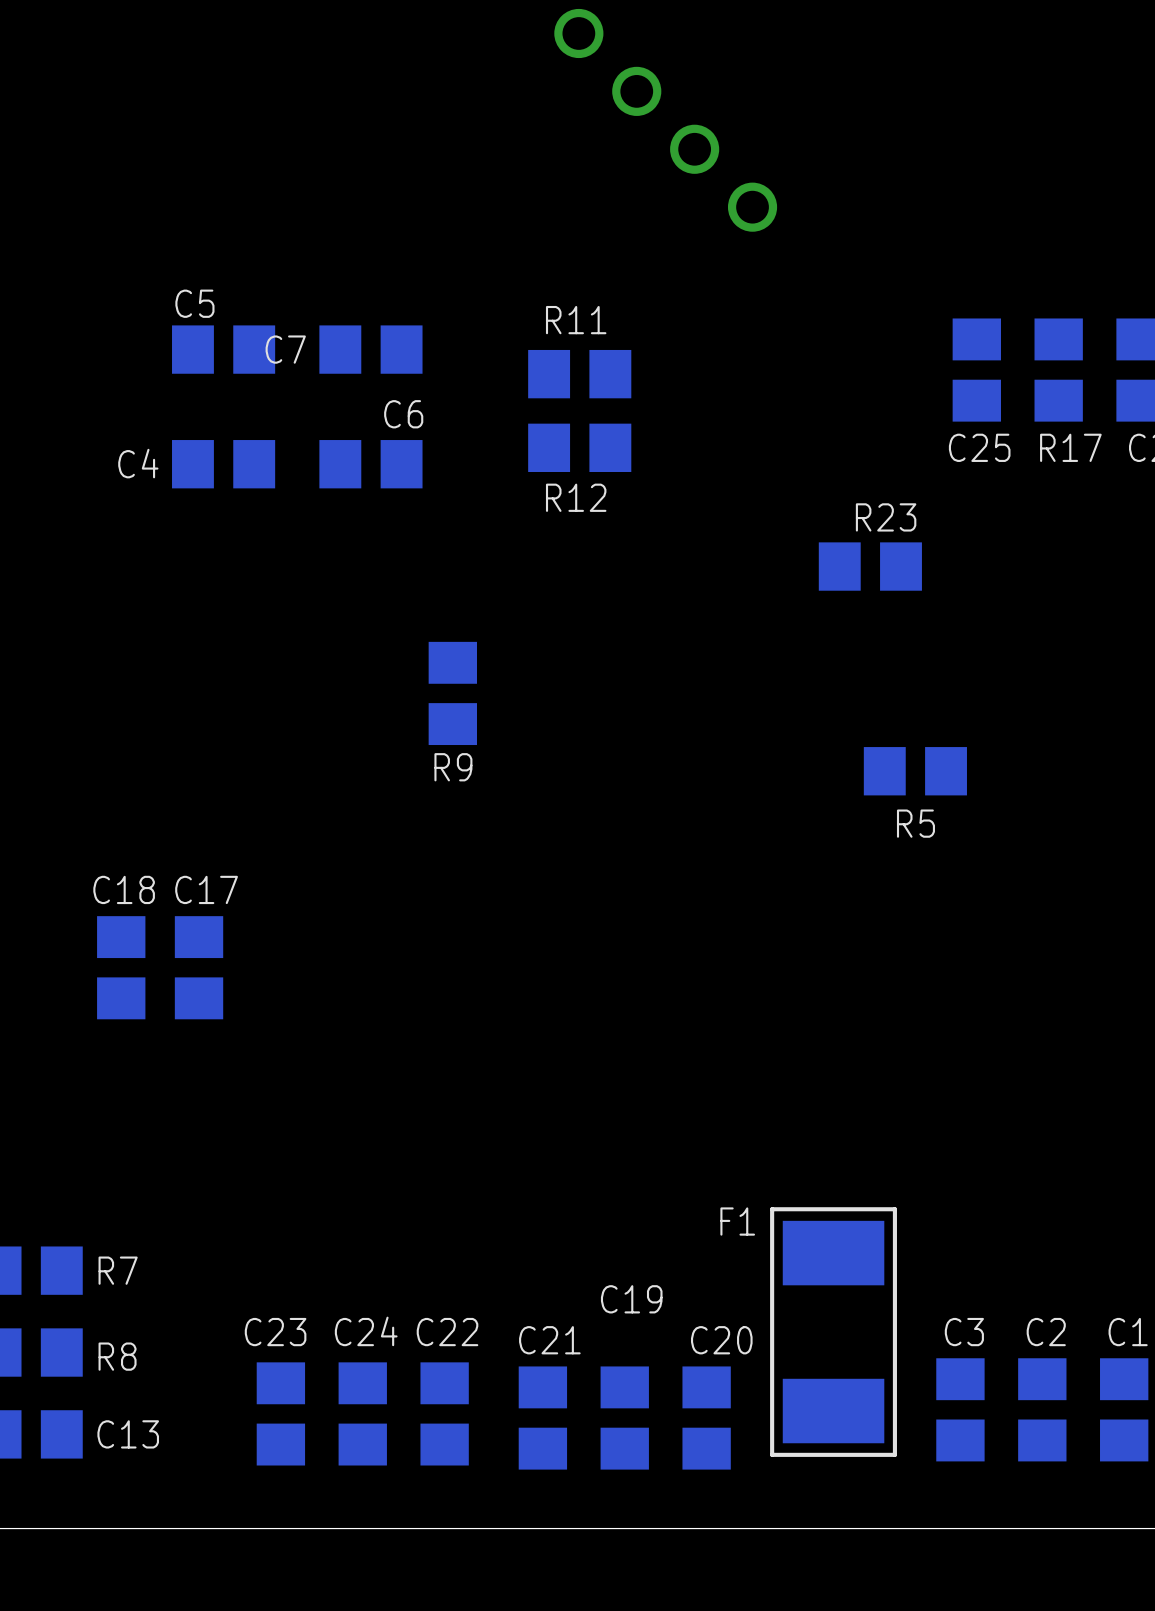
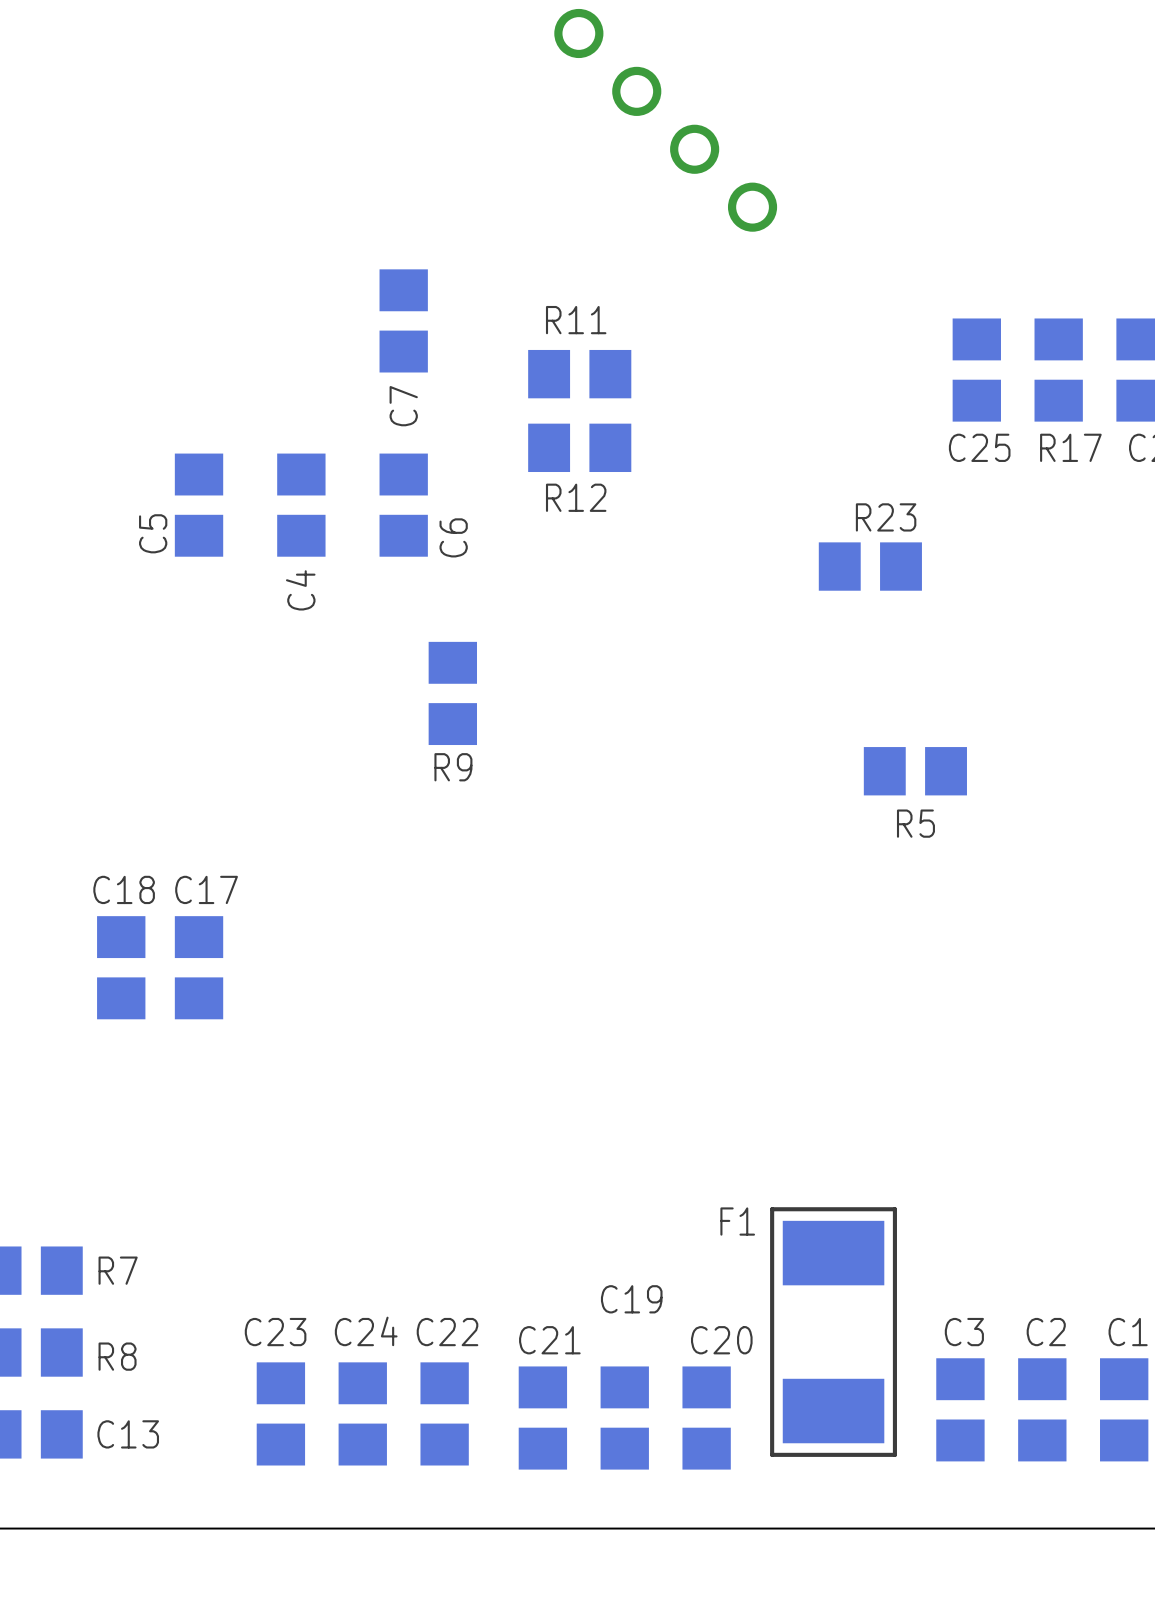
C5 name position: C5 (194, 303) -> C5 (153, 533)
C5 rotation: 0° (223, 349) -> 90° clockwise (199, 505)
C5 position: (223, 349) -> (199, 505)
C7 name position: C7 (285, 349) -> C7 (403, 406)
C7 rotation: 0° (370, 349) -> 90° clockwise (403, 320)
C4 name position: C4 (138, 463) -> C4 (300, 590)
C4 rotation: 0° (223, 464) -> 90° clockwise (301, 505)
C4 position: (223, 464) -> (301, 505)
C6 rotation: 0° (370, 464) -> 90° clockwise (403, 505)

